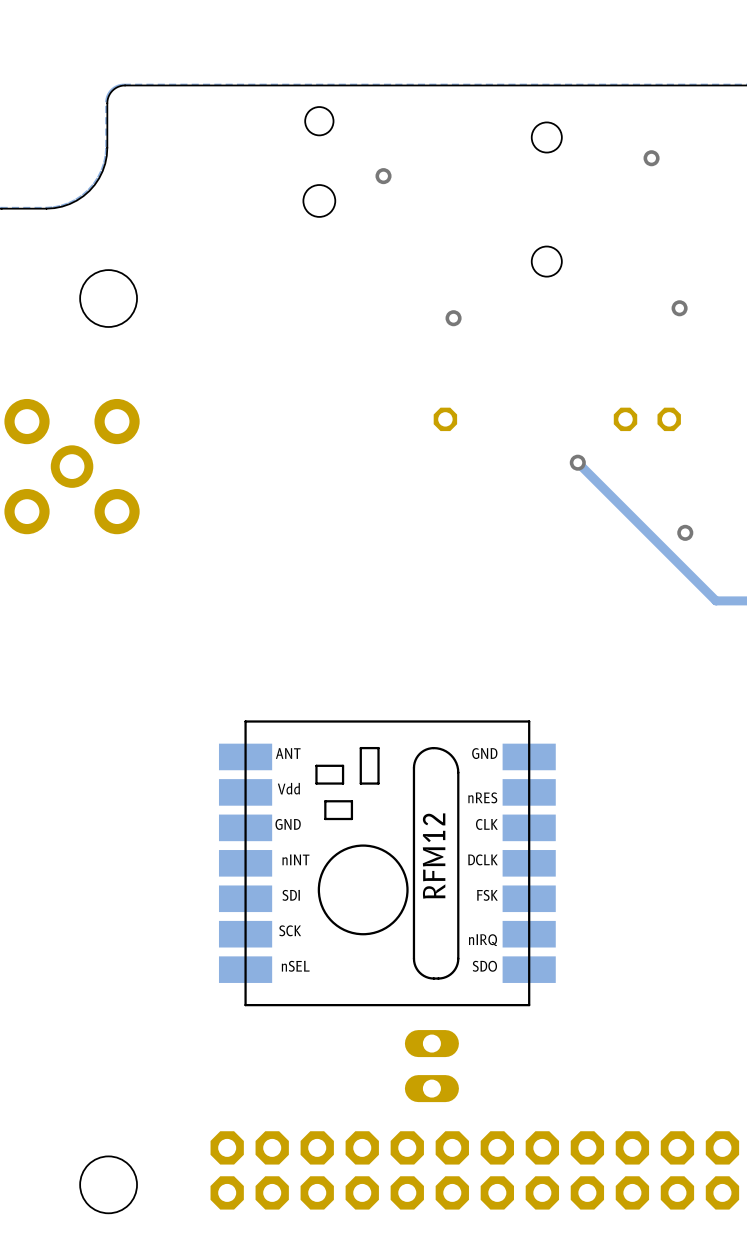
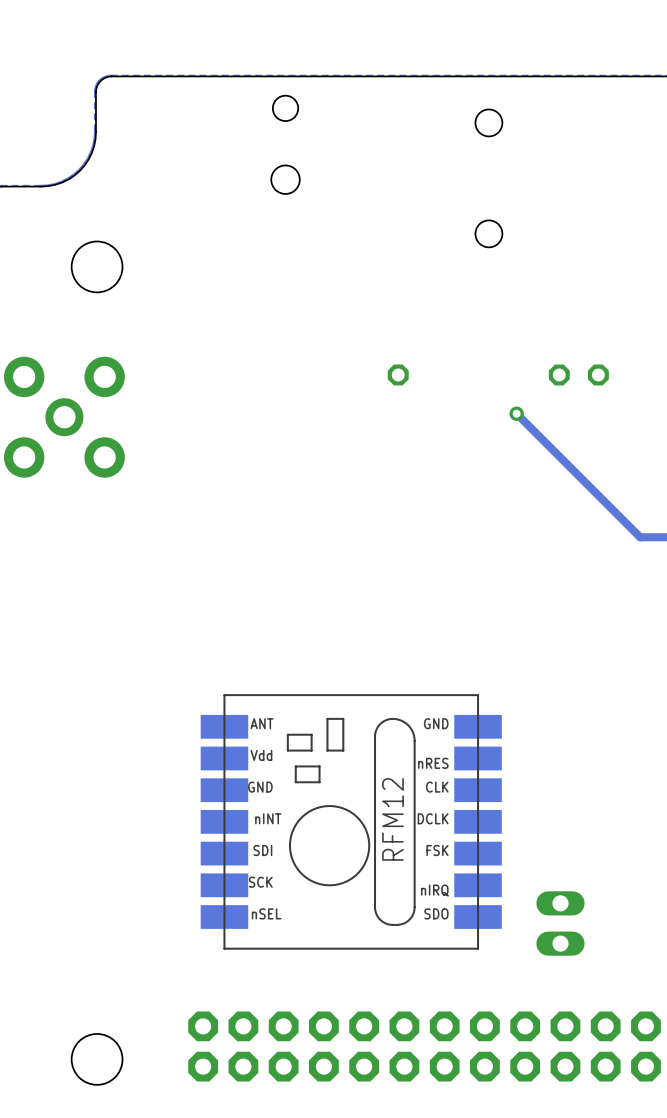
via: (651, 158) -> none
via: (383, 176) -> none
via: (679, 308) -> none
via: (453, 318) -> none
via: (685, 532) -> none
part position: (387, 863) -> (351, 821)
part position: (431, 1066) -> (560, 923)

